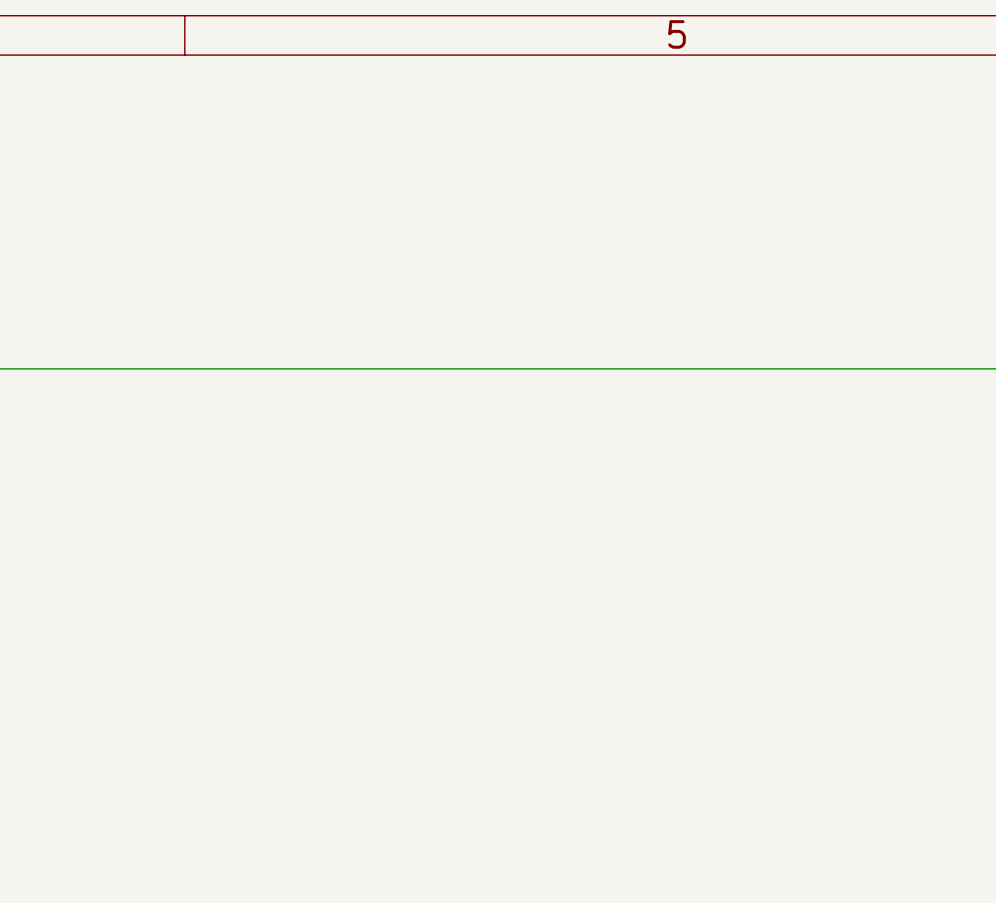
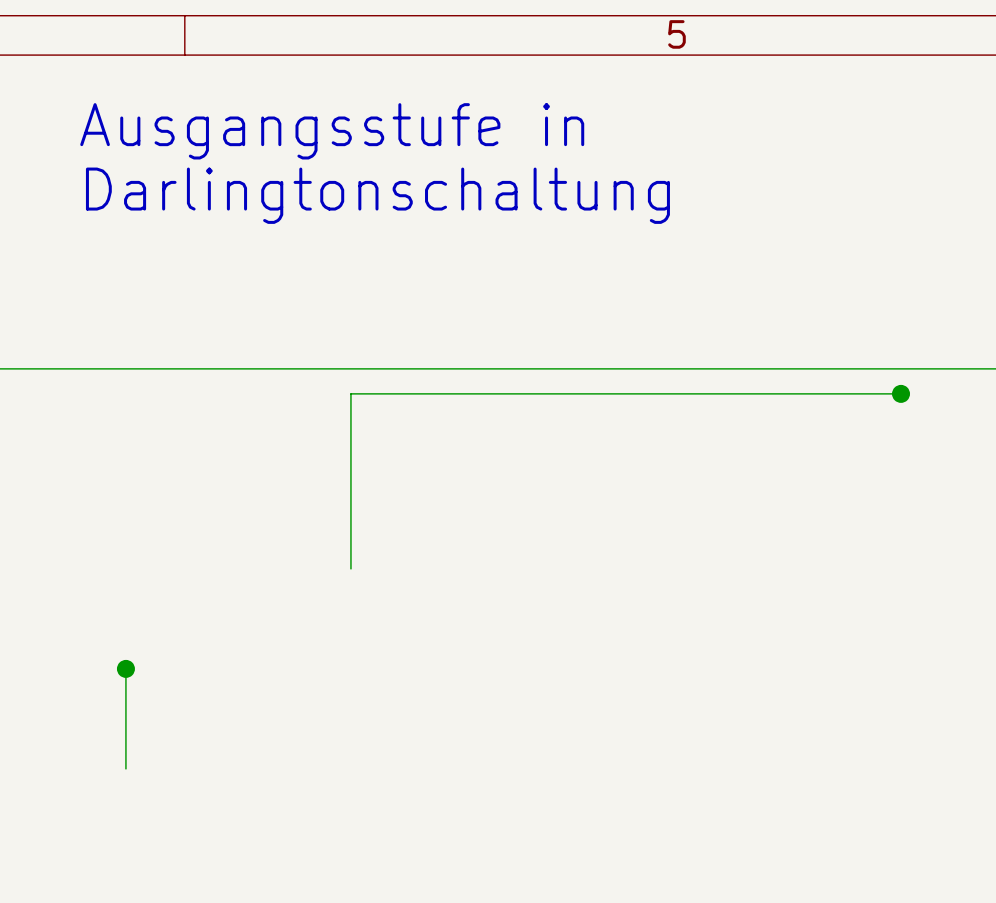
text: none -> Ausgangsstufe in (332, 131)
text: none -> Darlingtonschaltung (377, 195)
wire: none -> (901, 393) (350, 393) (350, 568)
junction: none -> (901, 393)
wire: none -> (125, 668) (125, 768)
junction: none -> (125, 668)

